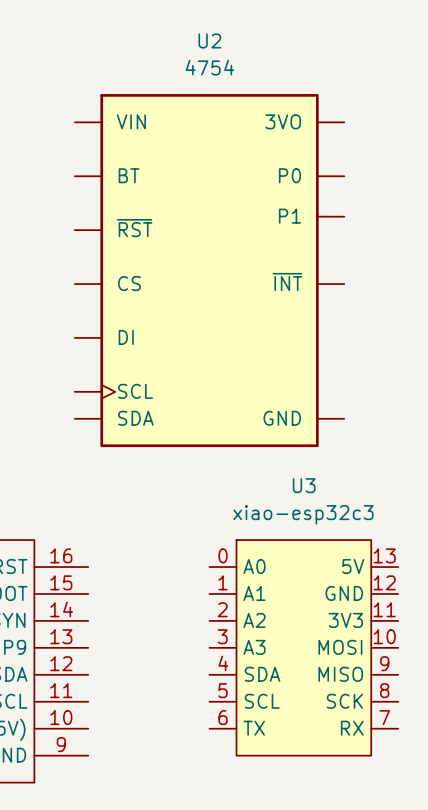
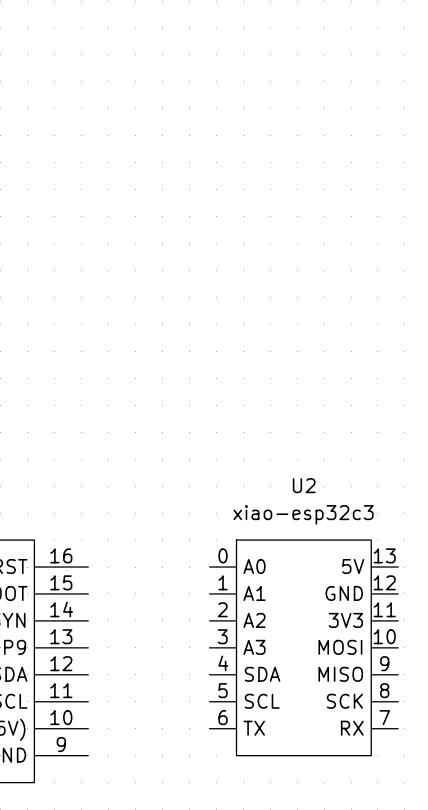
U2: 4754 (209, 270) -> none
U3 name: U3 (304, 485) -> U2 (304, 485)

